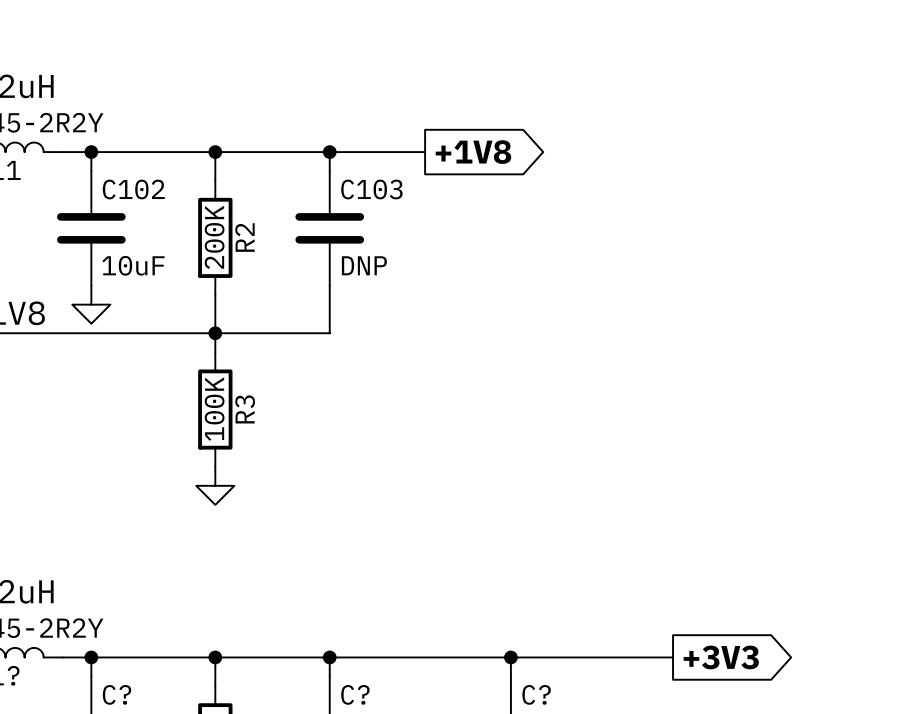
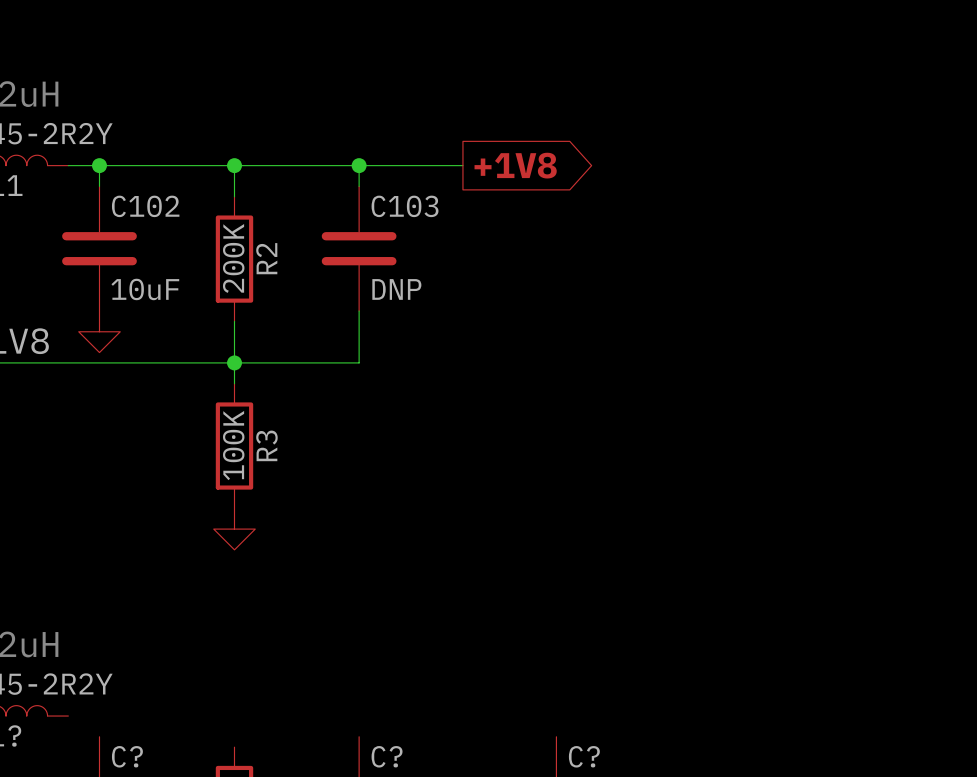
wire: (62, 657) (673, 657) -> none
wire: (91, 657) (91, 676) -> none
junction: (91, 657) -> none
wire: (215, 657) (215, 686) -> none
junction: (215, 657) -> none
wire: (329, 657) (329, 676) -> none
junction: (329, 657) -> none
wire: (510, 657) (510, 676) -> none
junction: (510, 657) -> none
global label: +3V3 (721, 657) -> none

